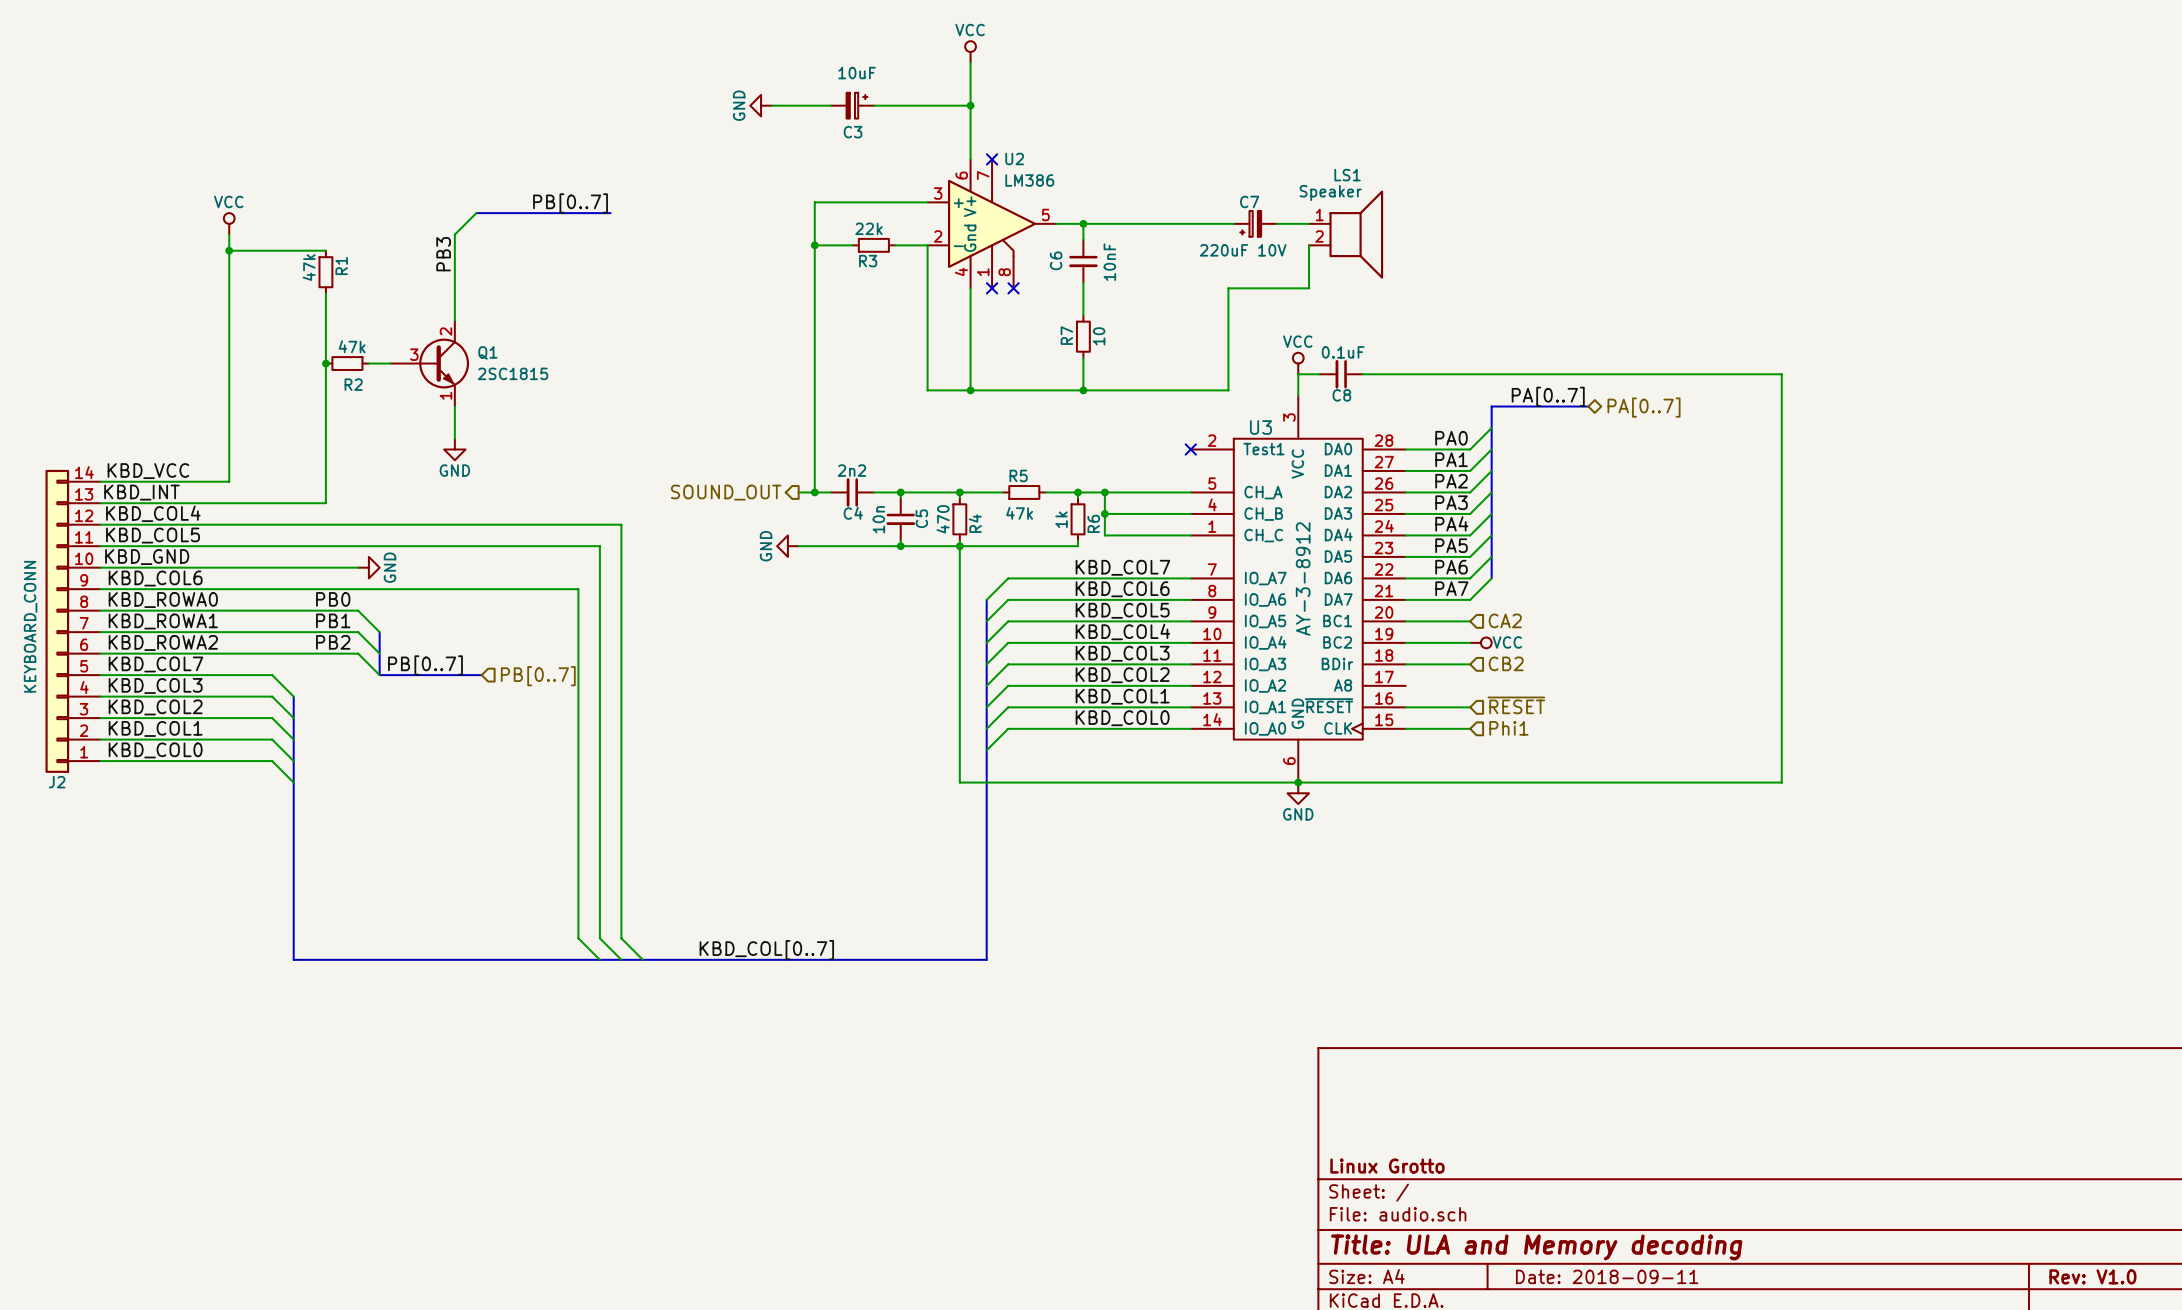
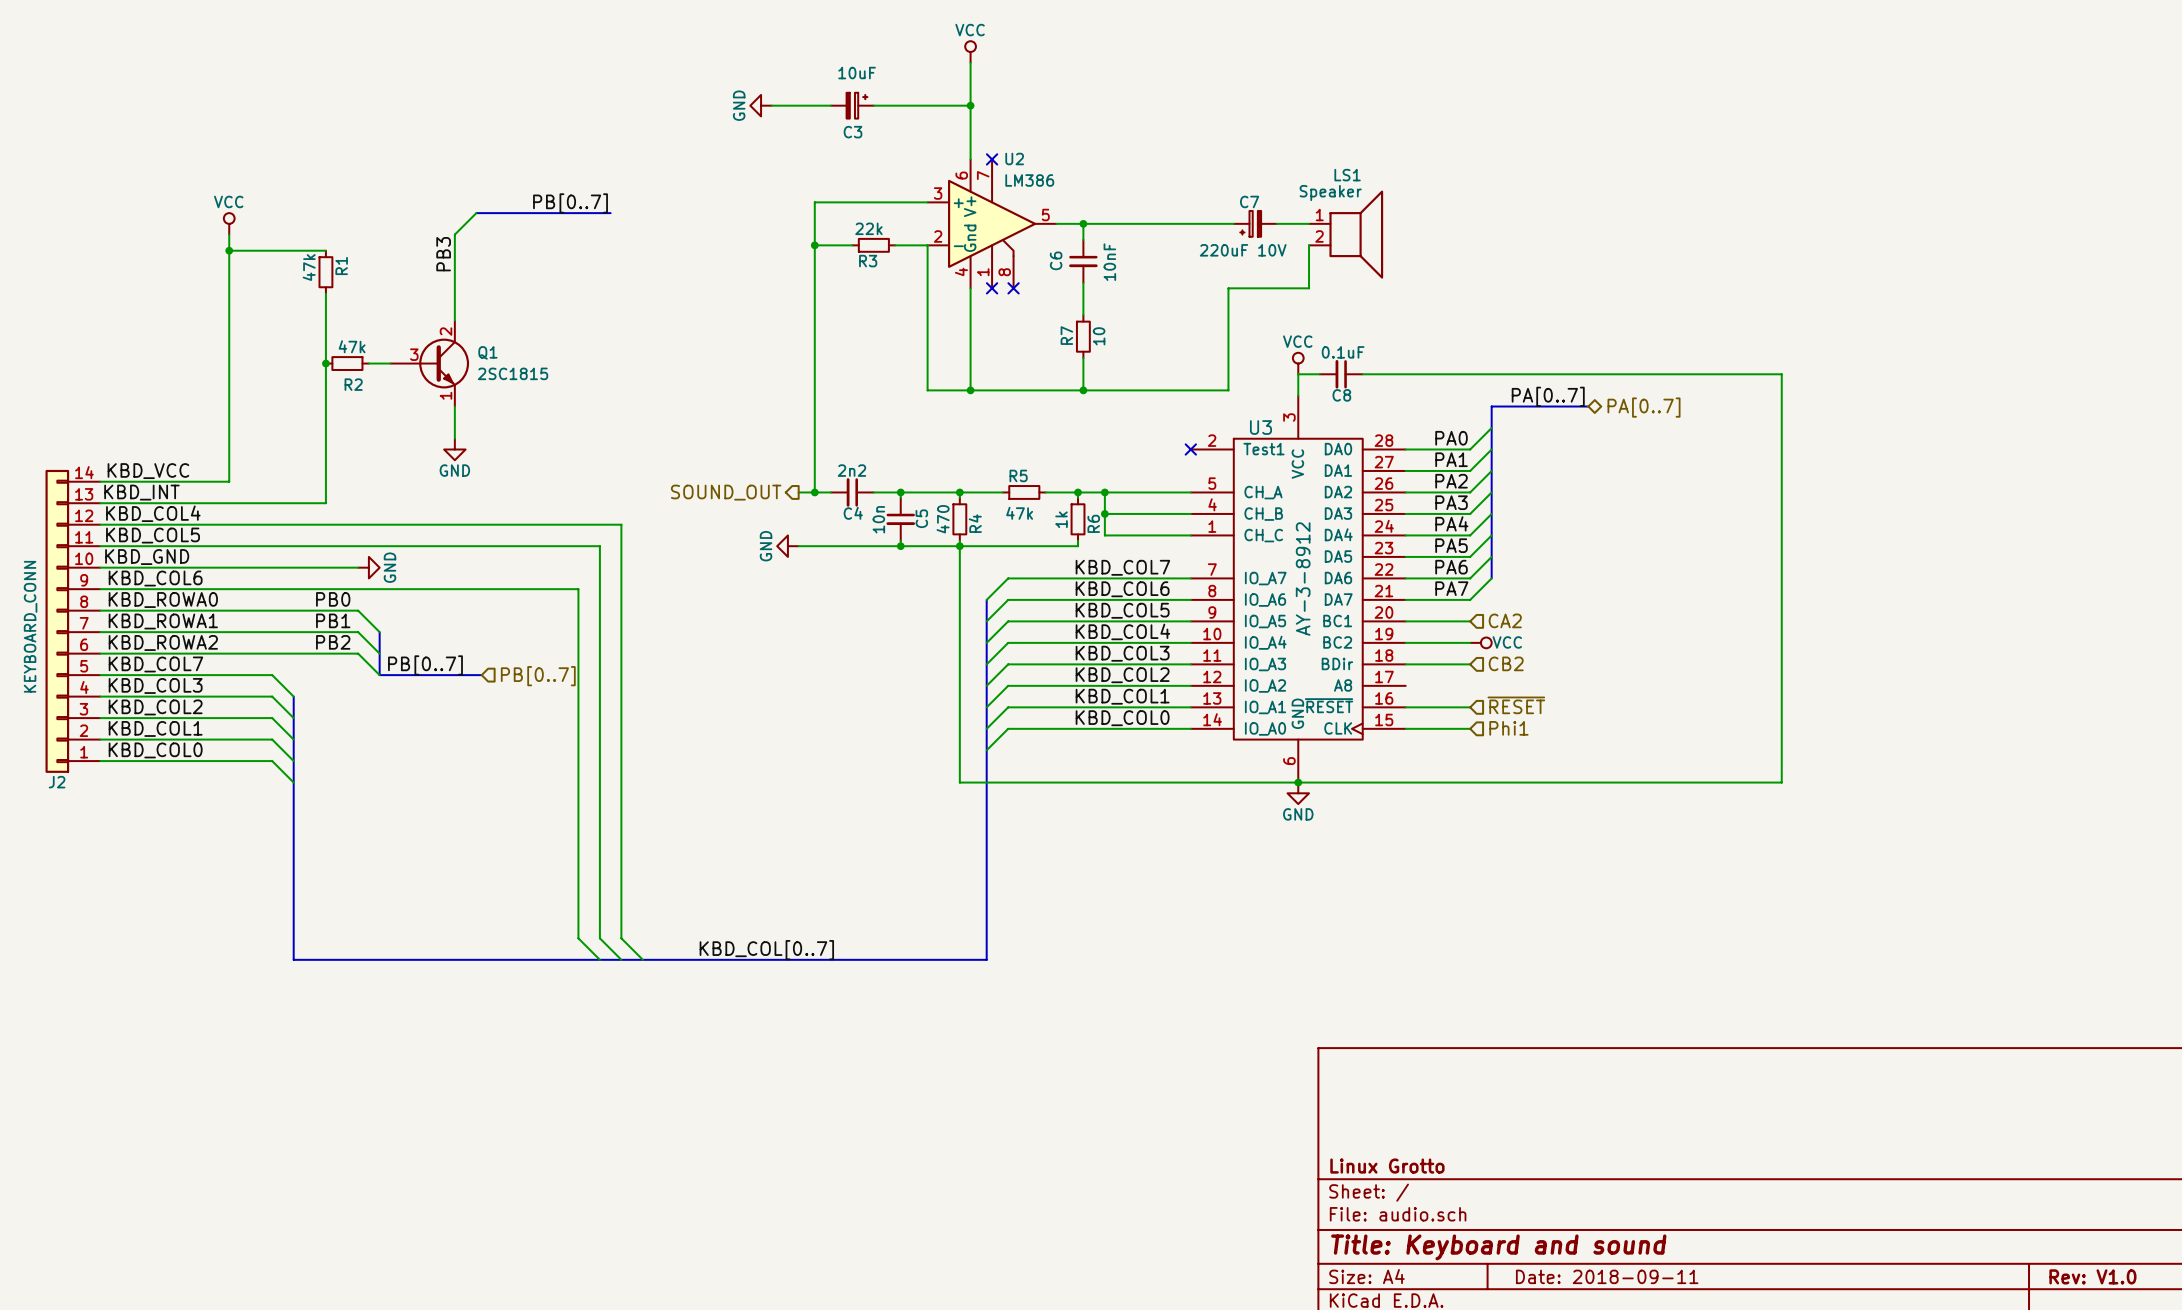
title block: Title: ULA and Memory decoding (1536, 1247) -> Title: Keyboard and sound (1498, 1247)

